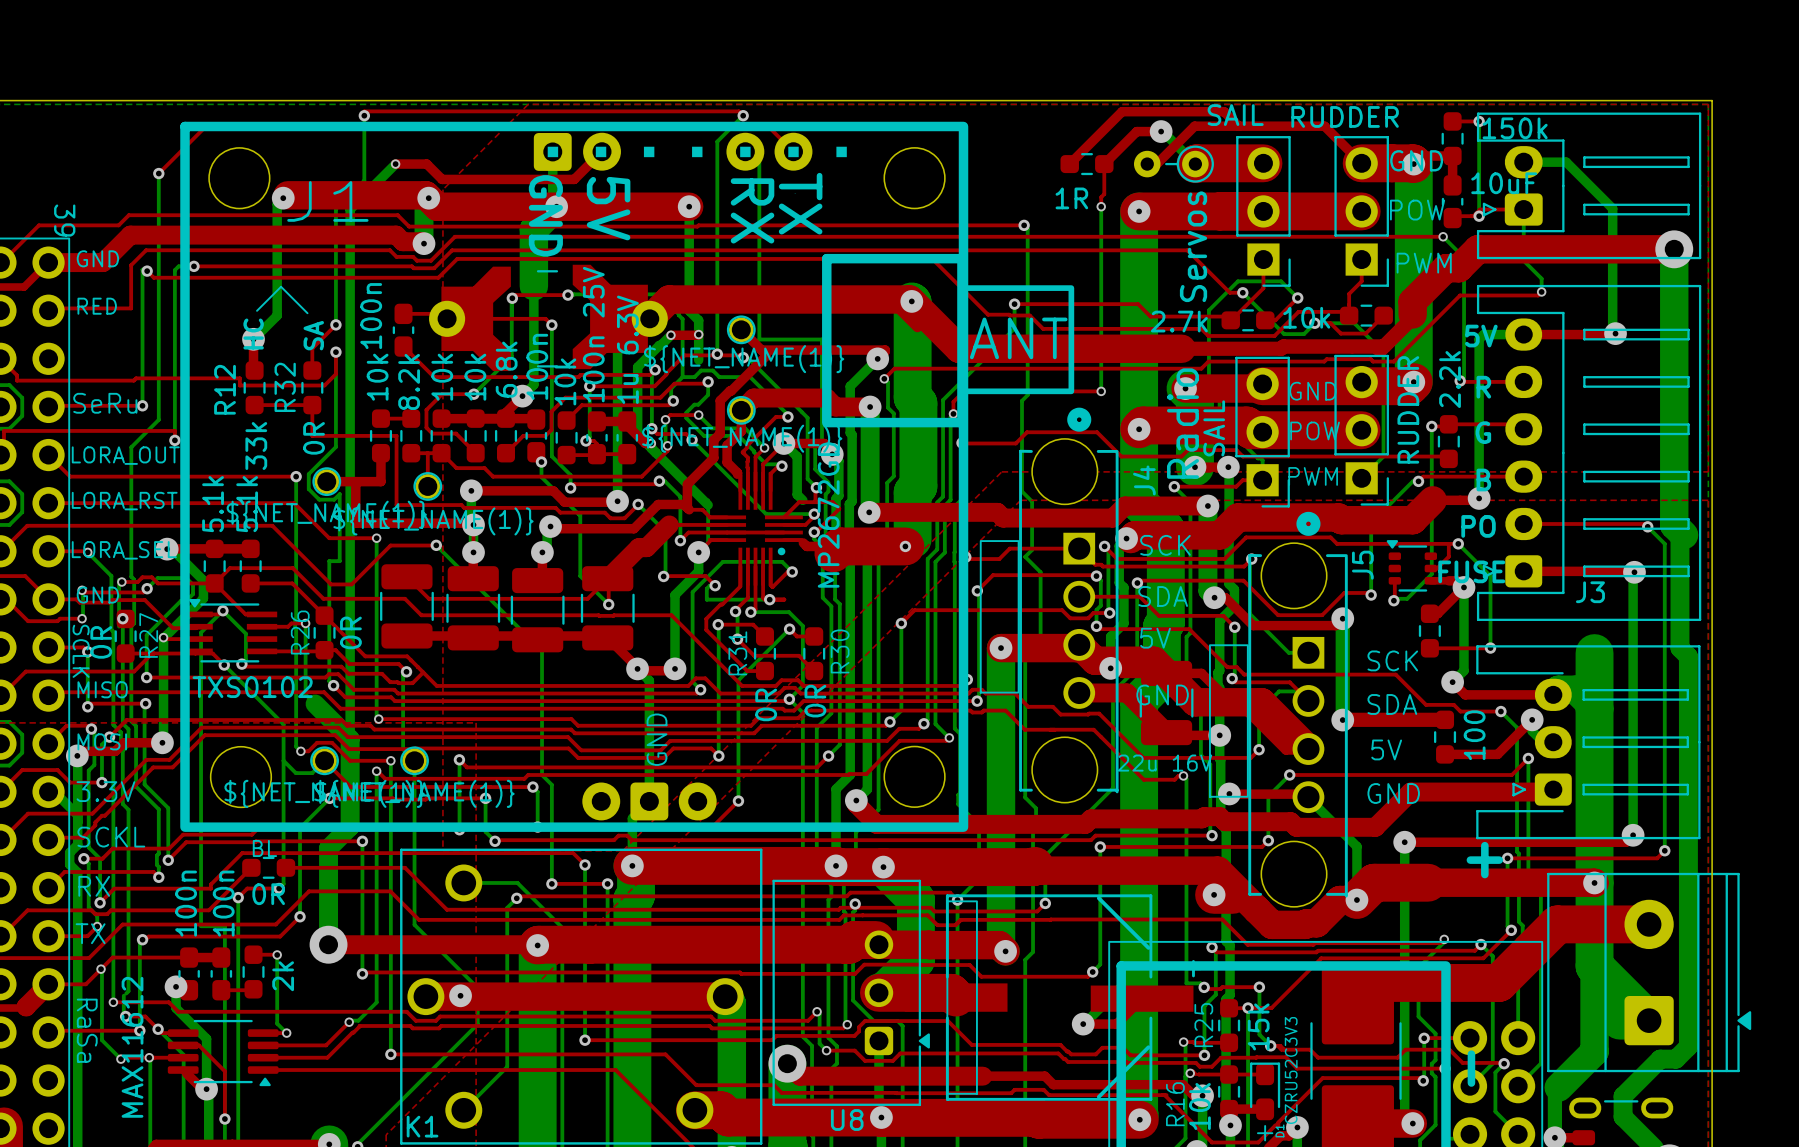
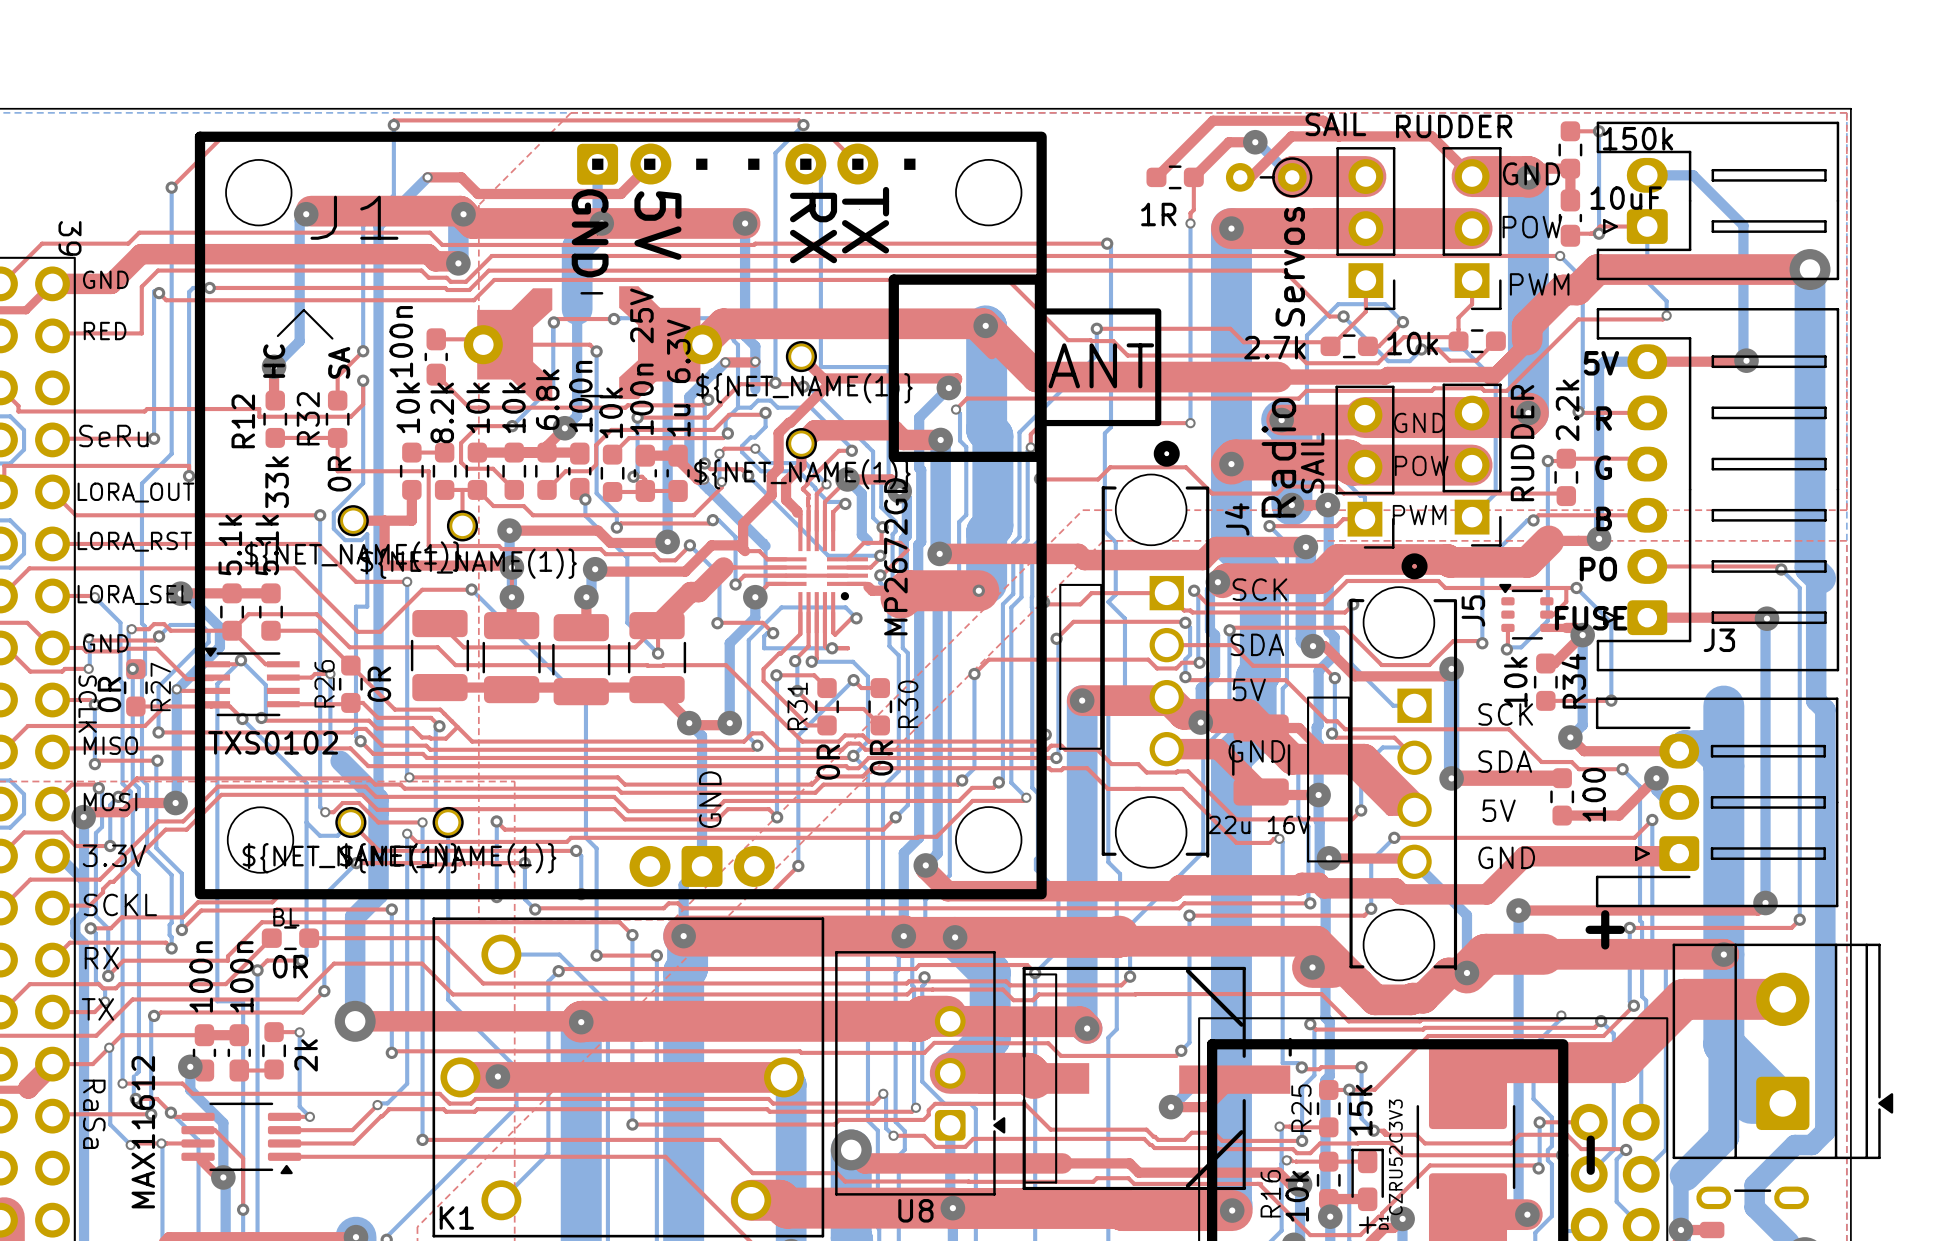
R34 name: none -> R34 (1573, 681)
R34 value: none -> 10k (1515, 682)

